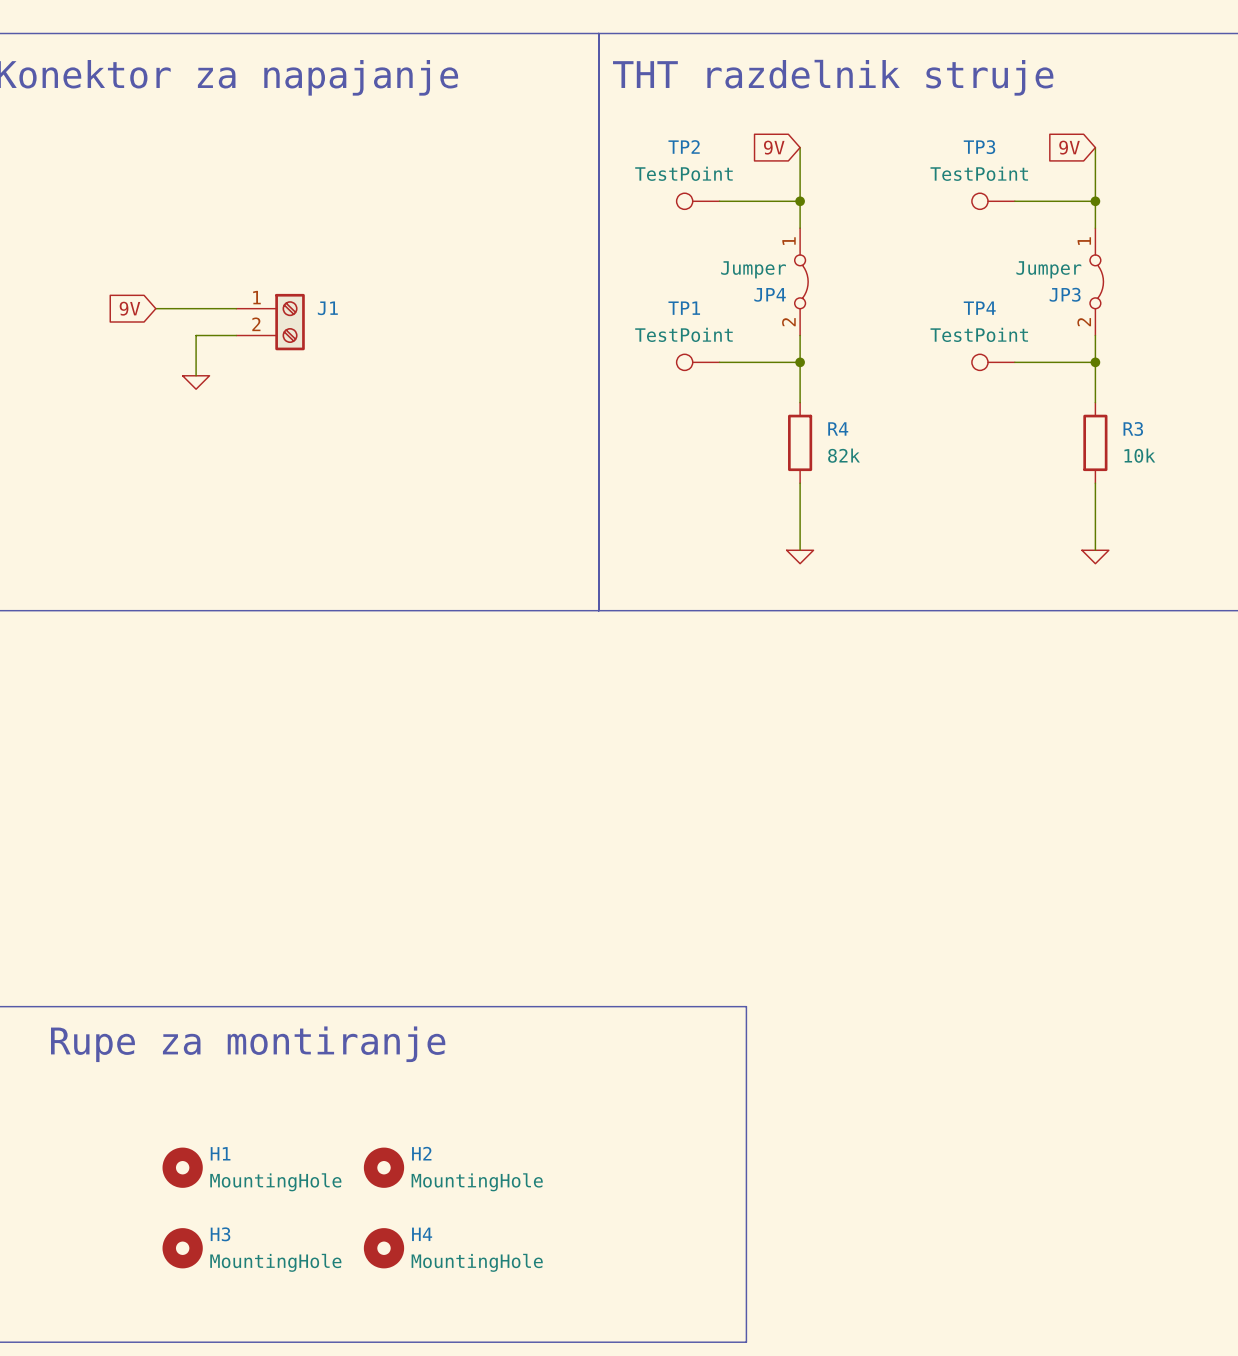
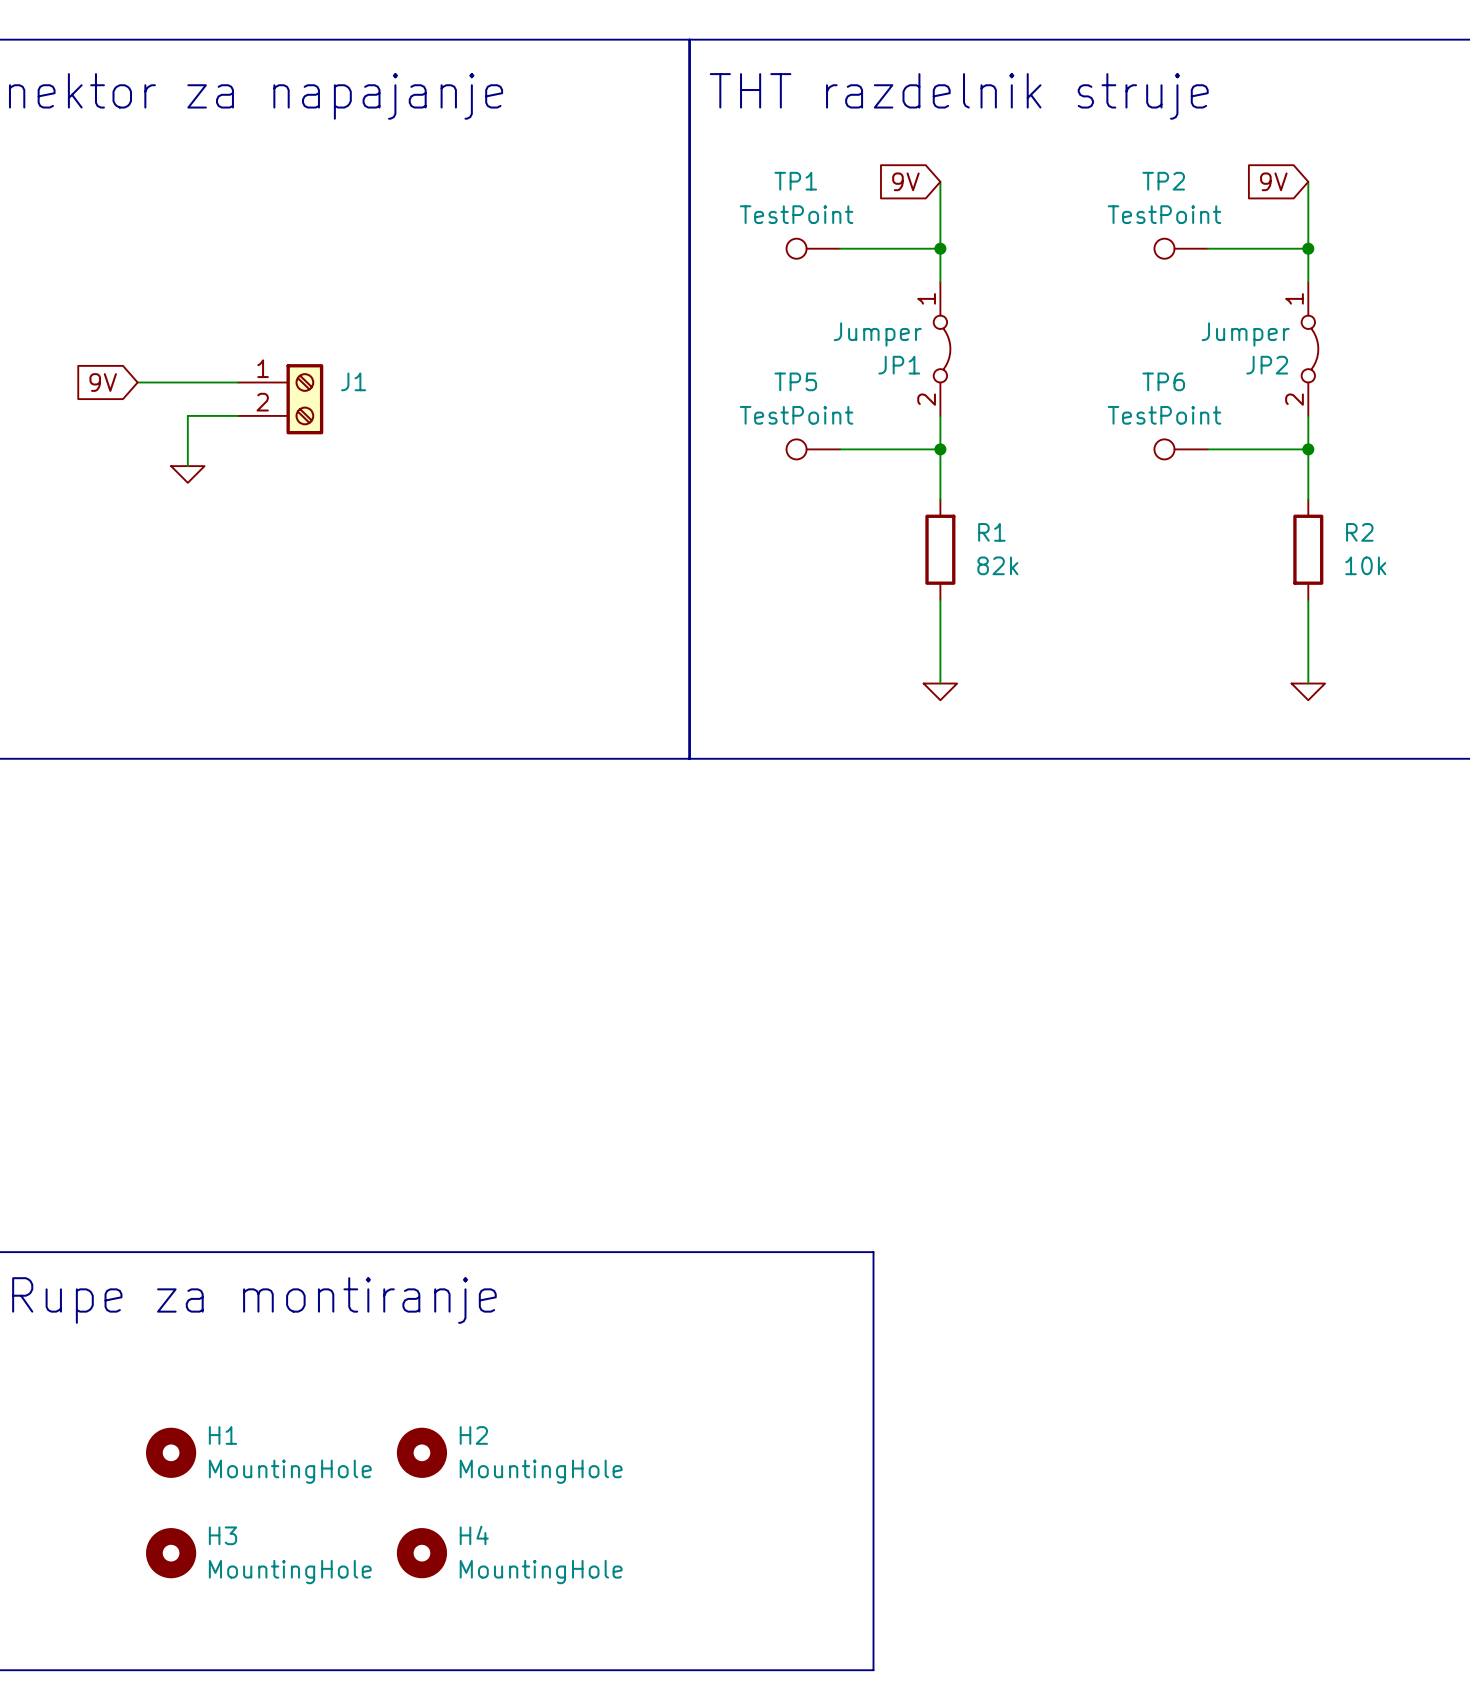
TP2 name: TP2 (684, 146) -> TP1 (795, 181)
TP3 name: TP3 (979, 147) -> TP2 (1163, 181)
JP4 name: JP4 (770, 294) -> JP1 (899, 365)
JP3 name: JP3 (1065, 294) -> JP2 (1267, 365)
TP1 name: TP1 (684, 308) -> TP5 (795, 381)
TP4 name: TP4 (979, 308) -> TP6 (1163, 381)
R4 name: R4 (838, 428) -> R1 (991, 532)
R3 name: R3 (1133, 428) -> R2 (1359, 532)

